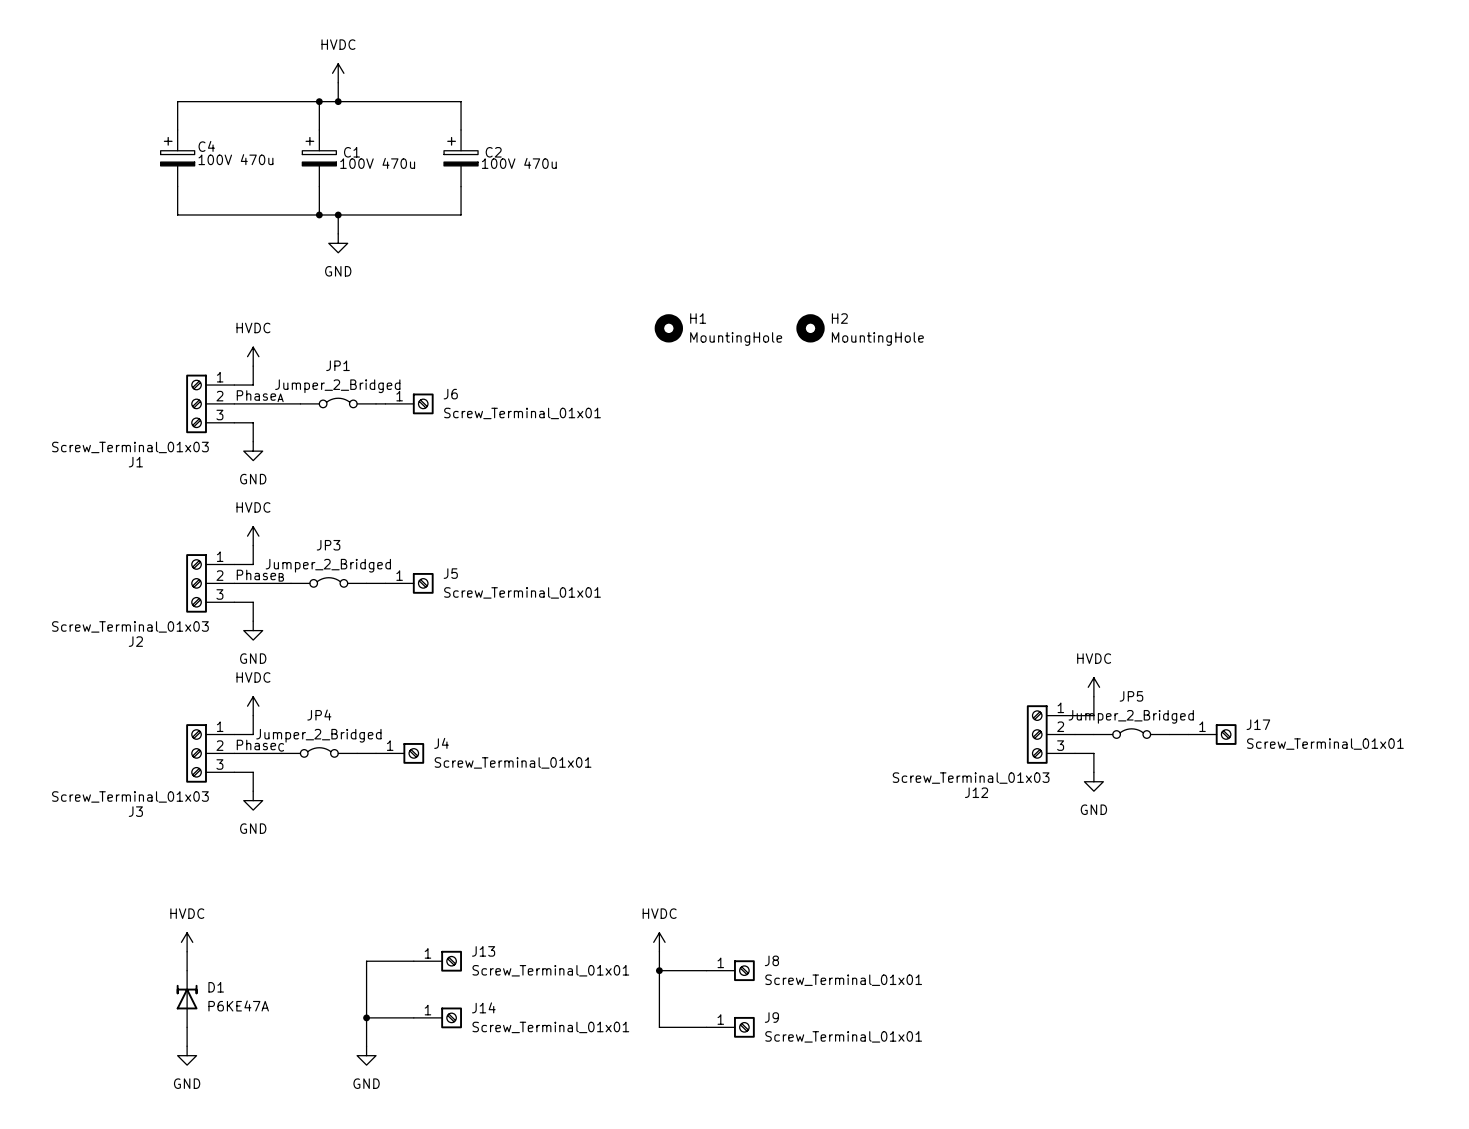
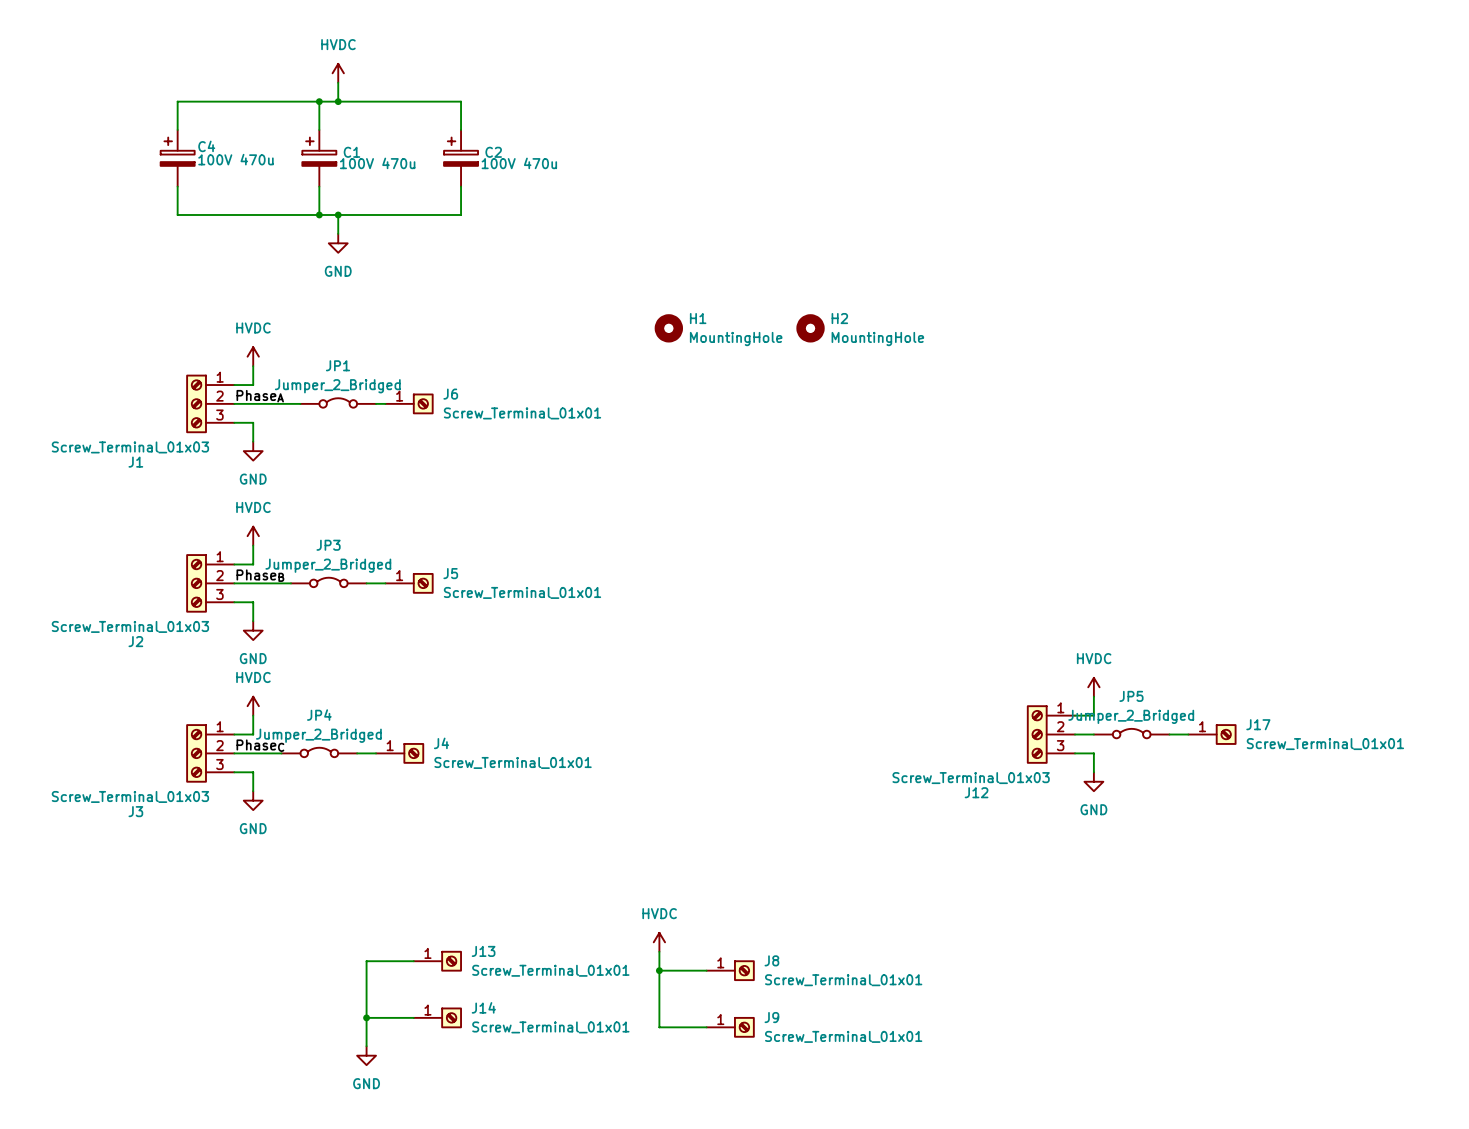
power symbol: HVDC (187, 942) -> none
wire: (187, 951) (187, 970) -> none
D1: P6KE47A (187, 999) -> none
wire: (187, 1027) (187, 1046) -> none
power symbol: GND (187, 1055) -> none

